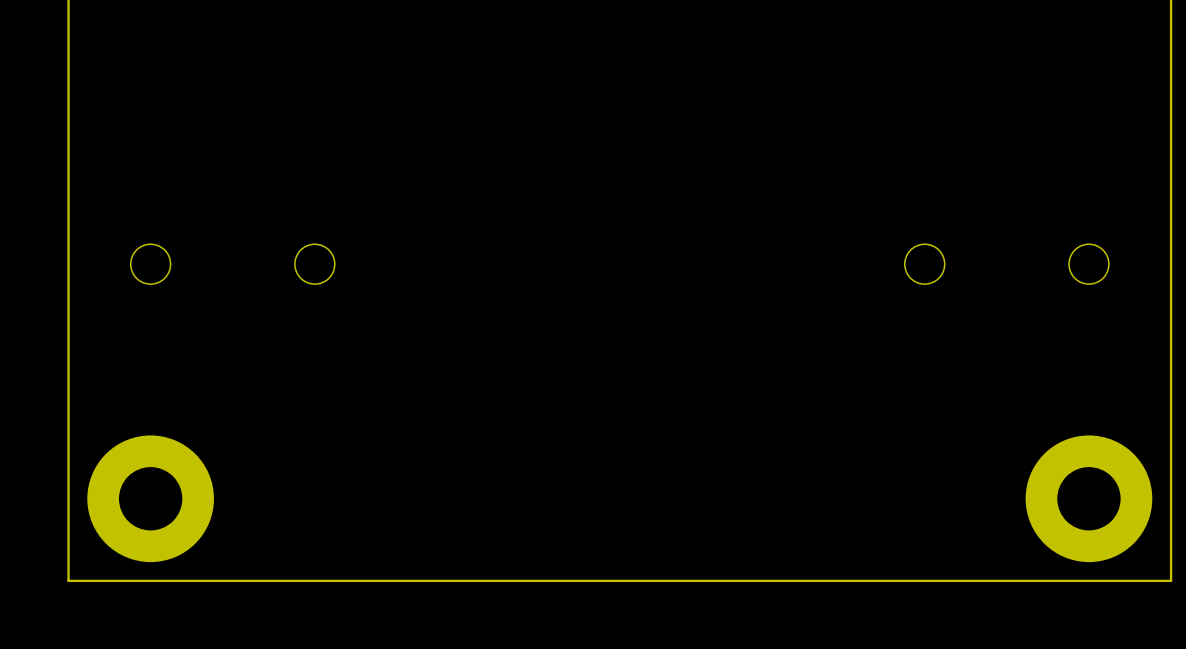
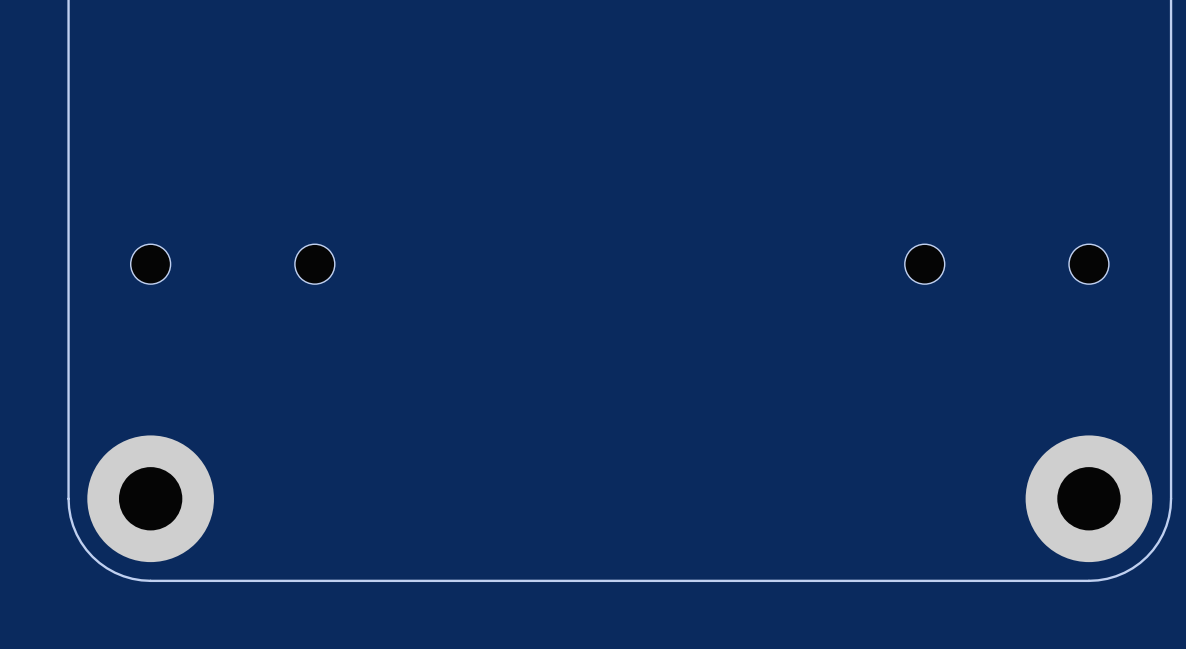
board edge: (68, 498) (68, 580) (150, 580) -> (68, 498) (73, 525) (81, 542) (92, 556) (106, 568) (123, 576) (150, 580)
board edge: (1171, 498) (1171, 580) (1088, 580) -> (1171, 498) (1166, 525) (1158, 542) (1147, 556) (1132, 568) (1116, 576) (1088, 580)

